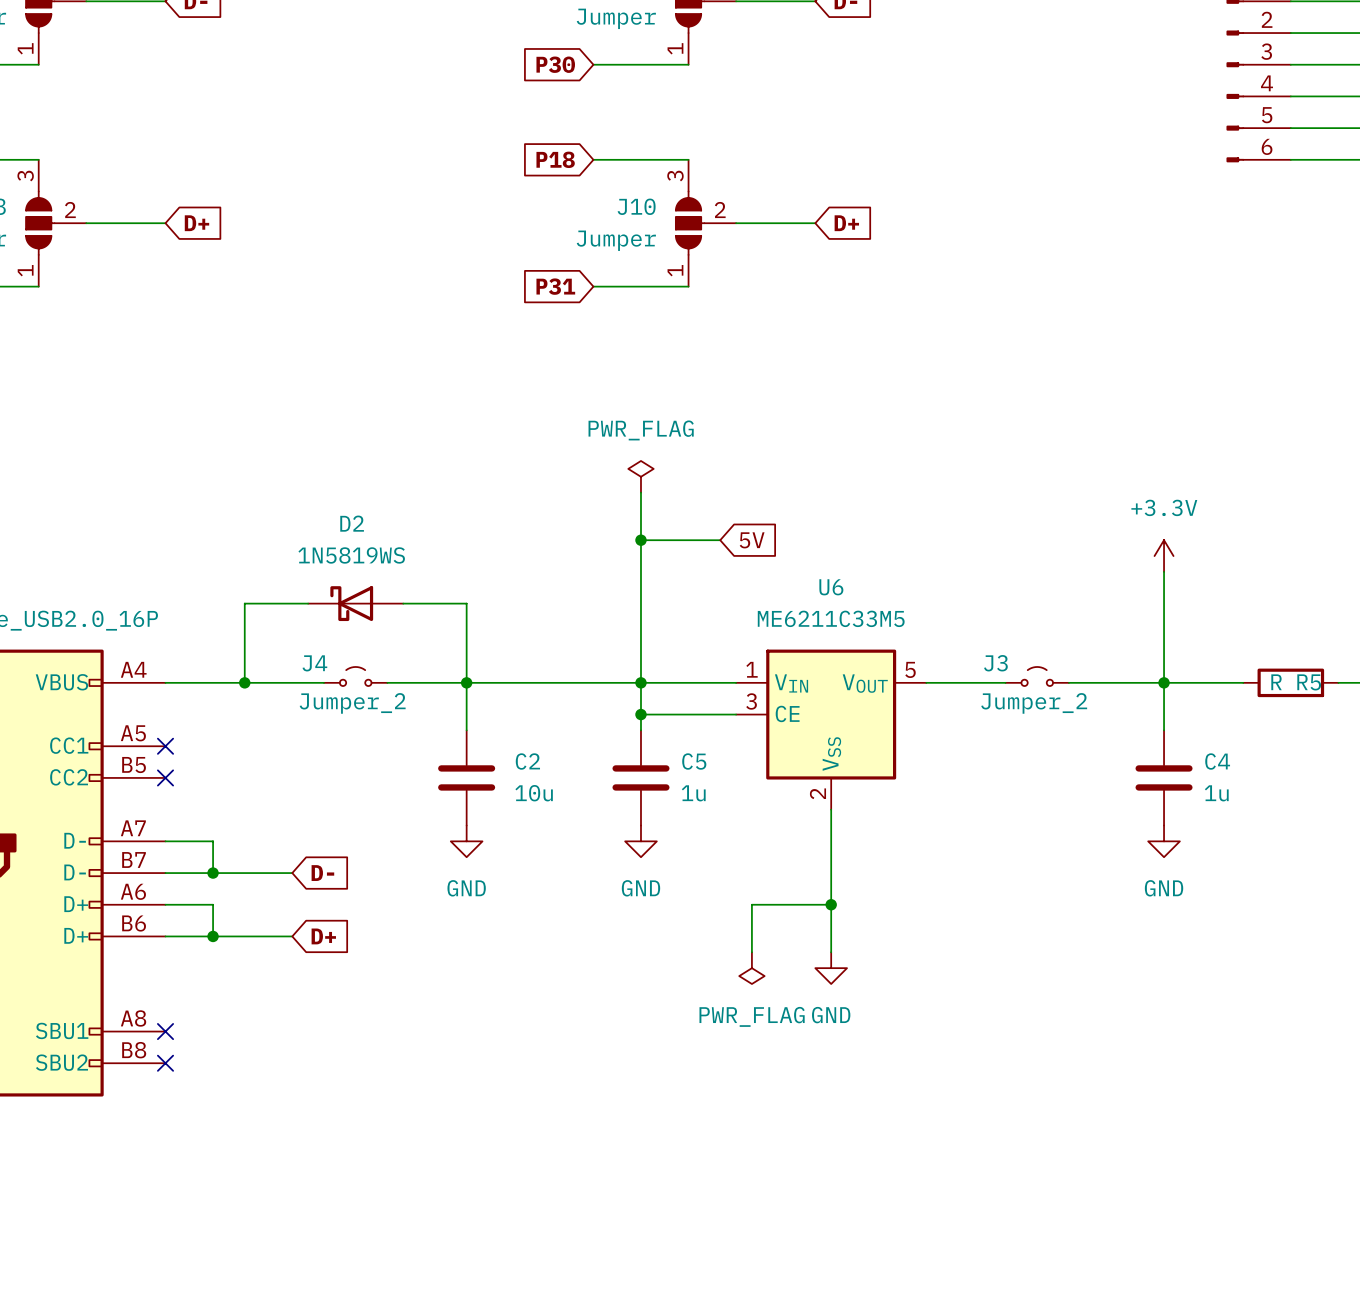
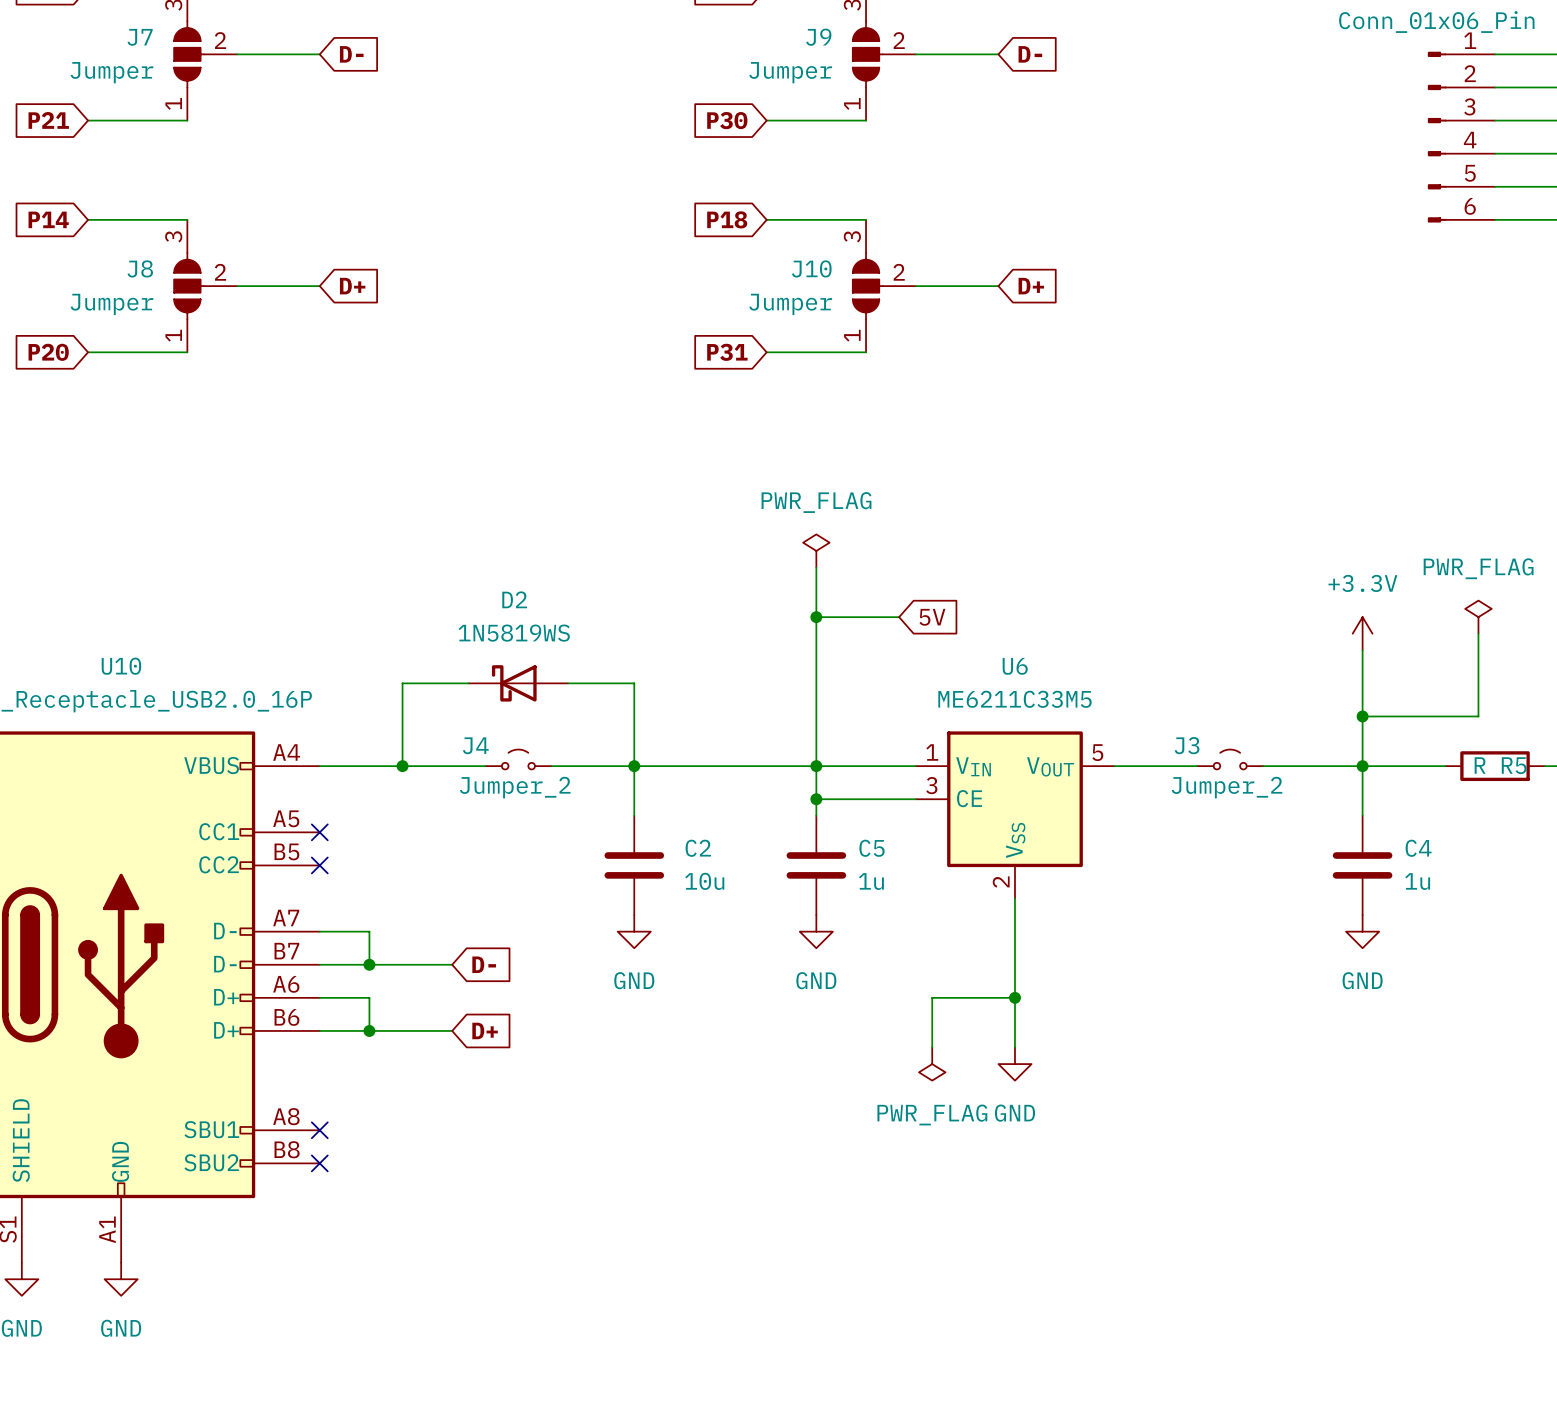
power symbol: none -> PWR_FLAG (1478, 617)
wire: none -> (1478, 633) (1478, 716) (1362, 716)
junction: none -> (1362, 716)

